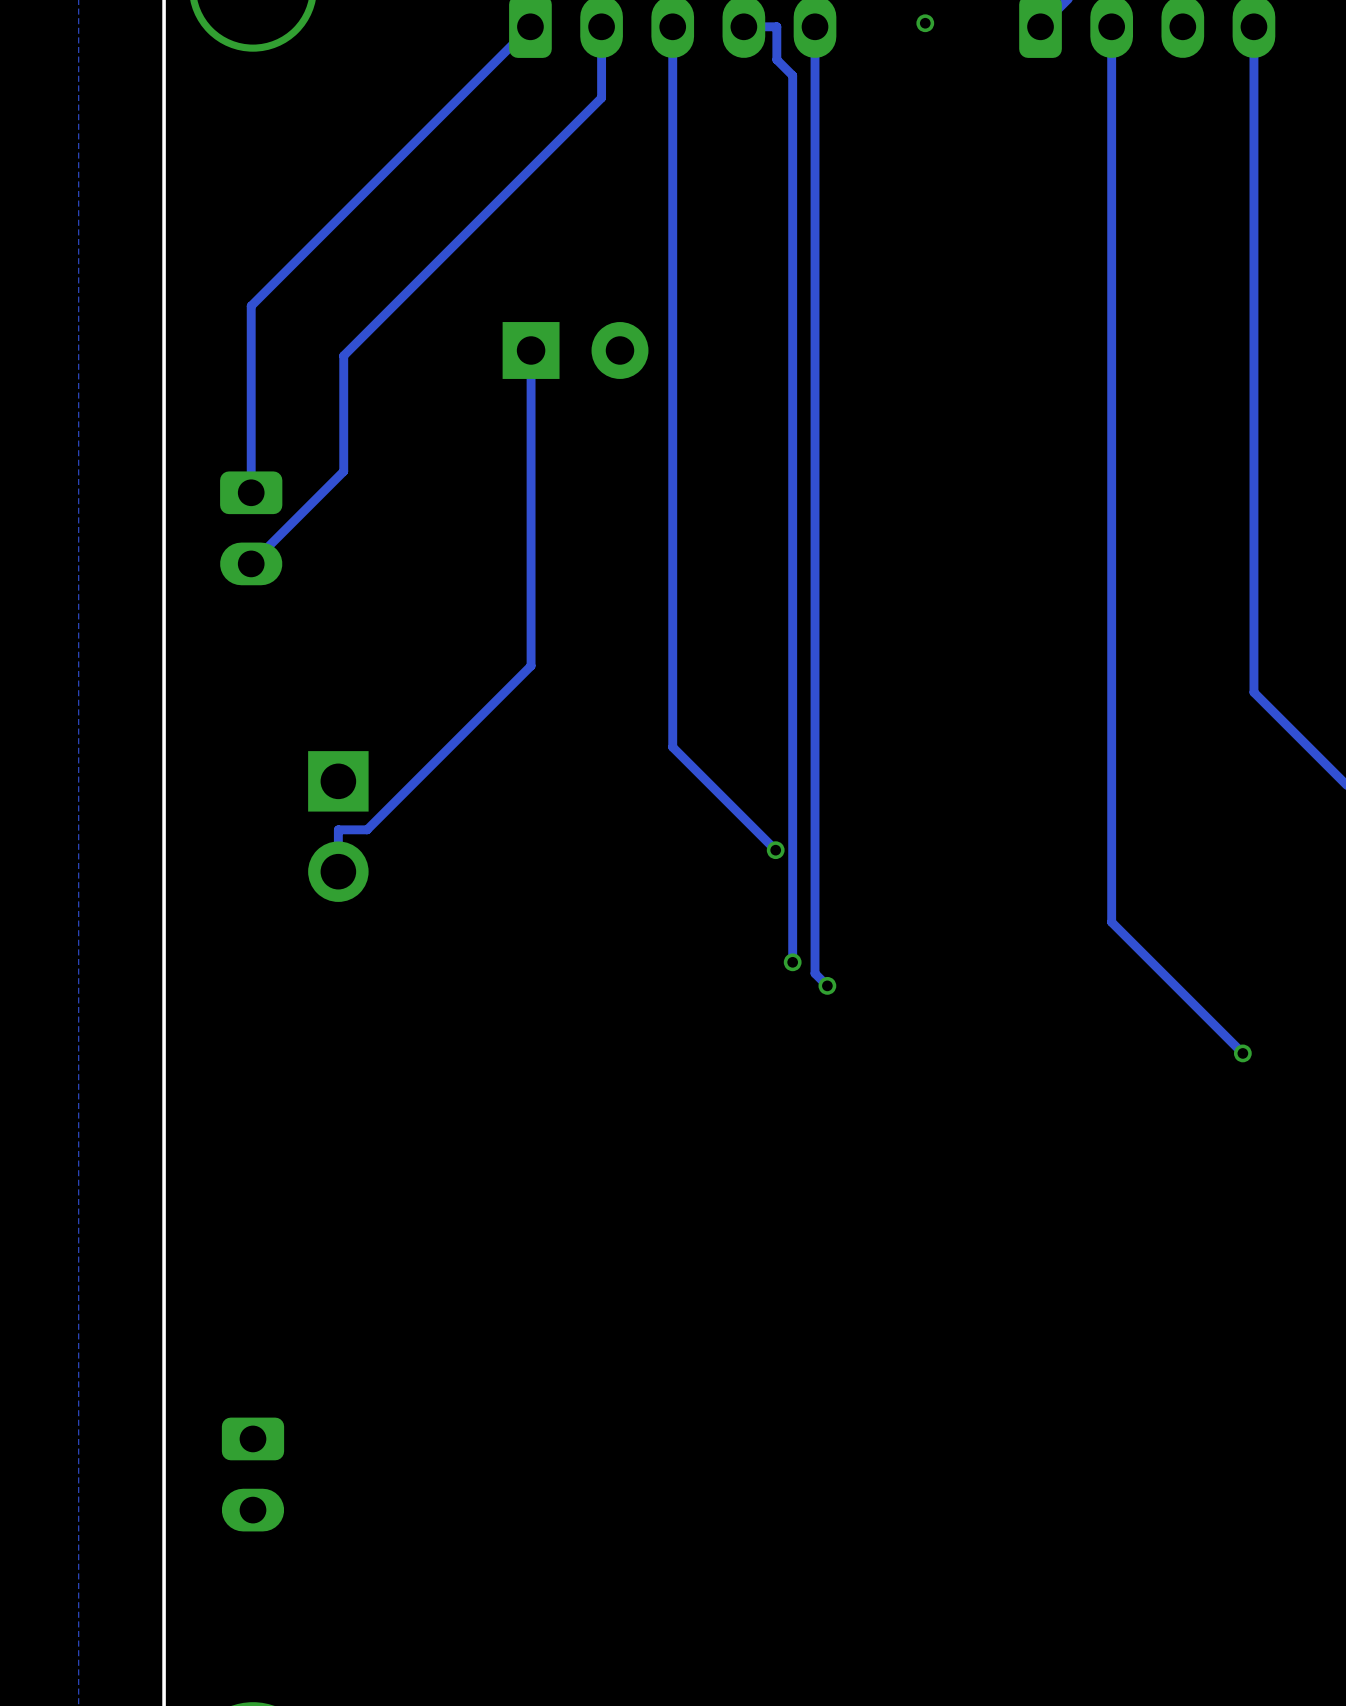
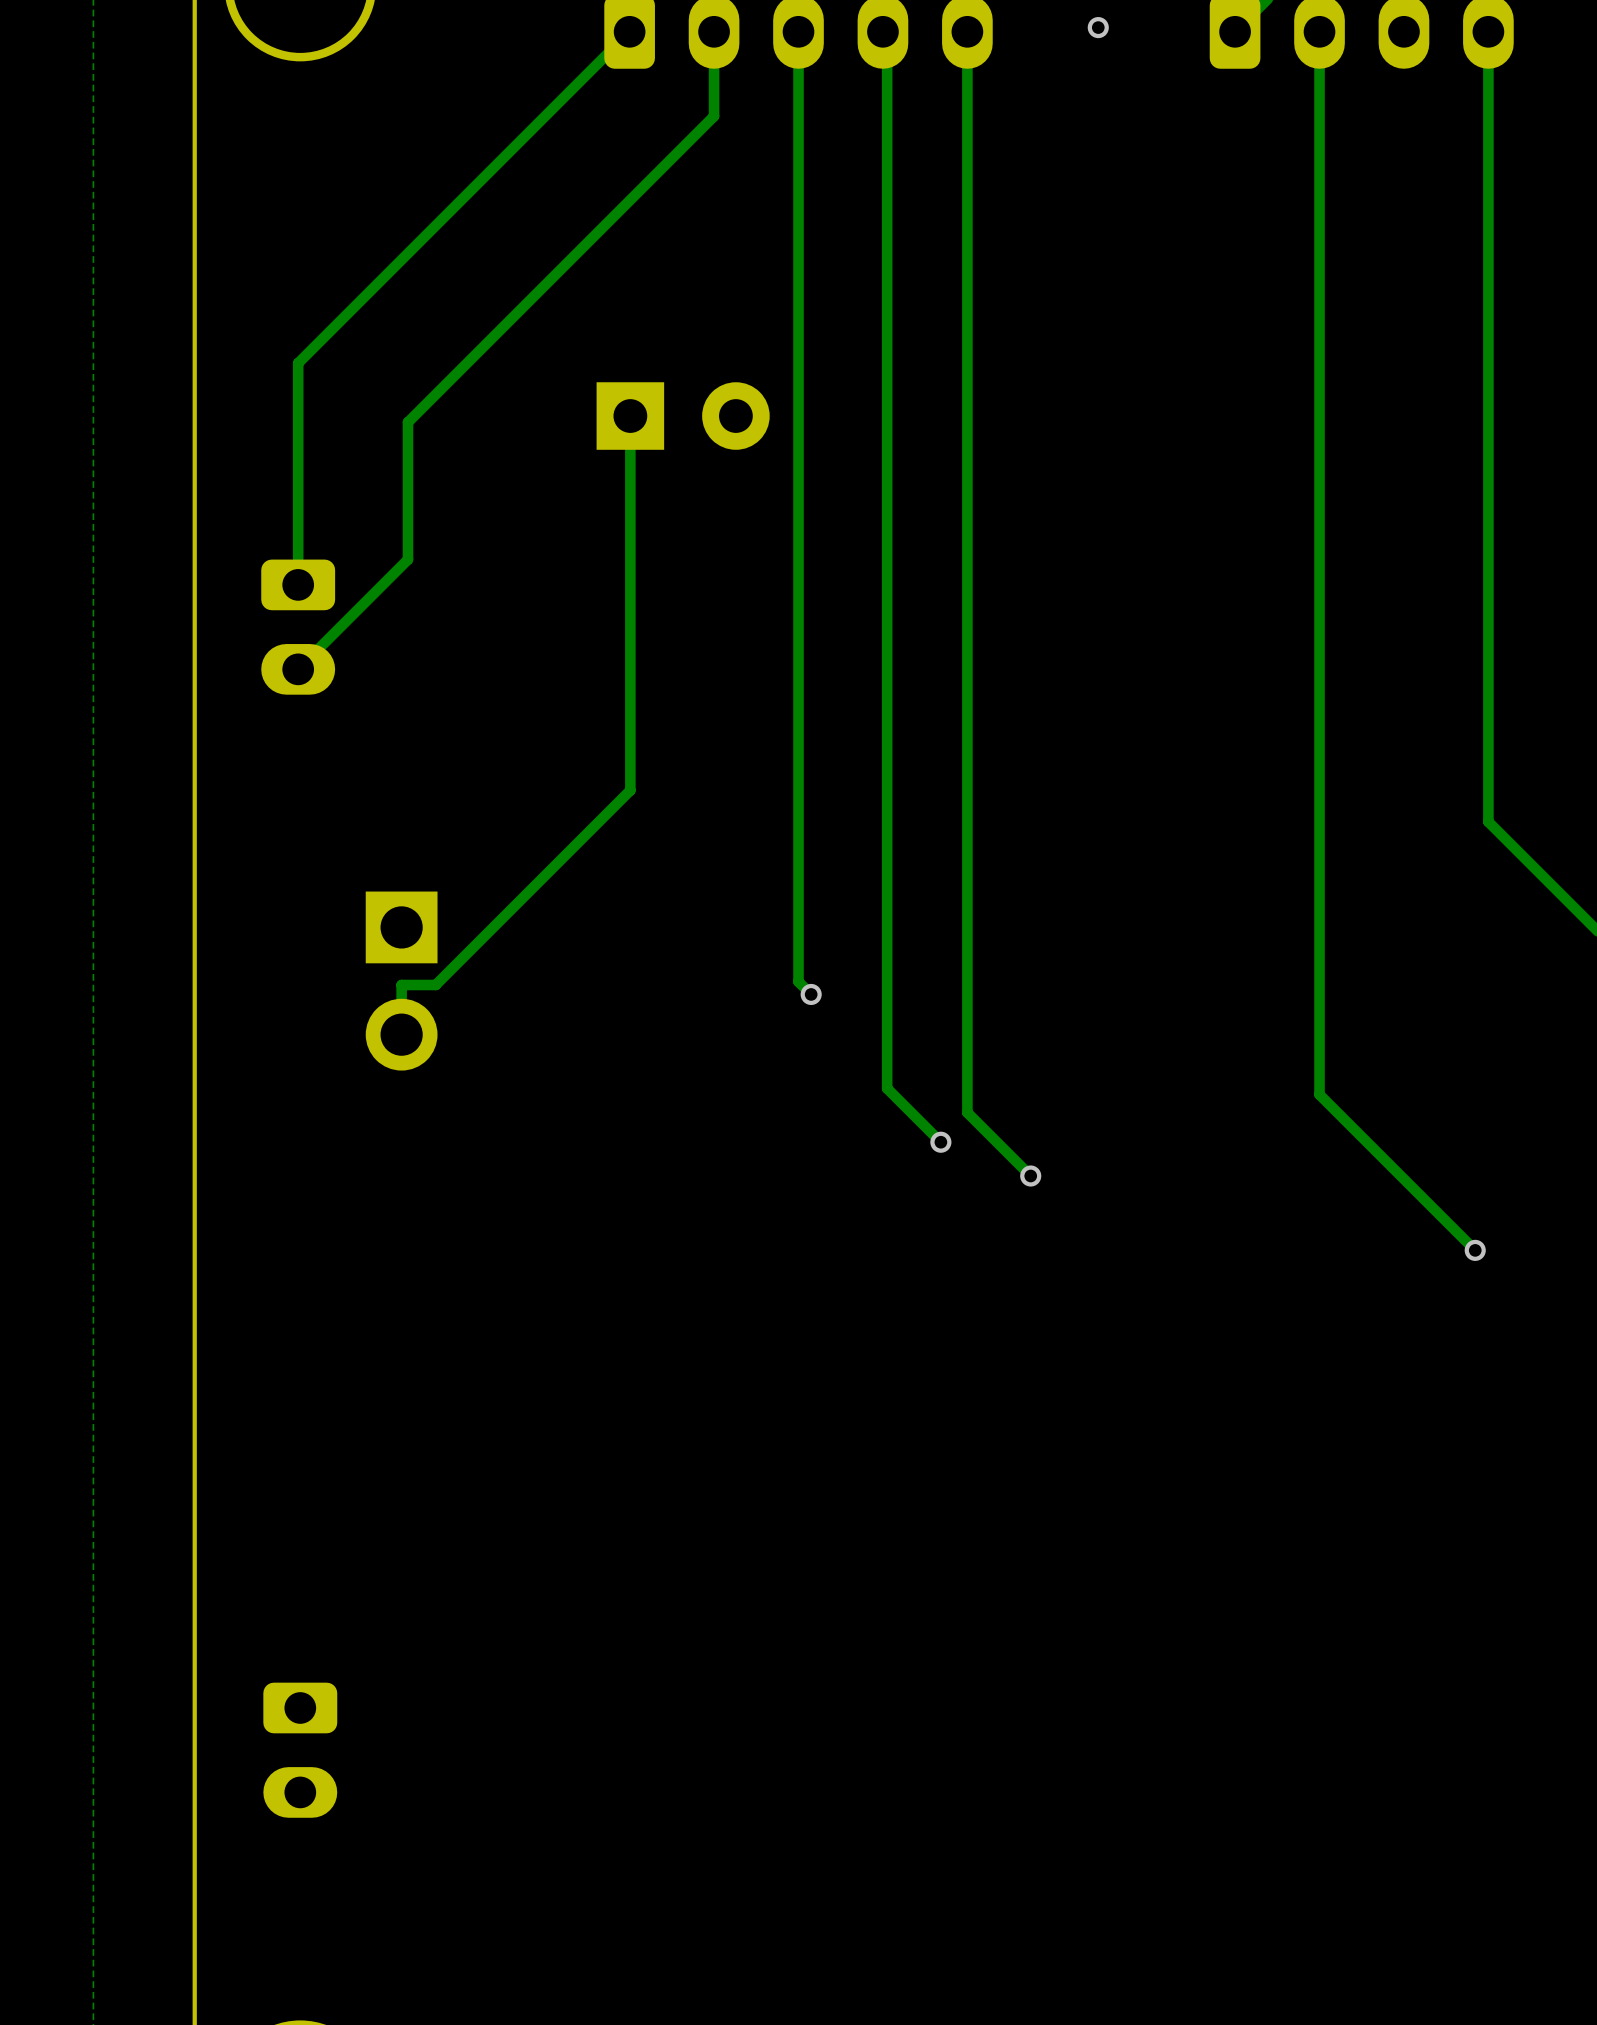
track: (743, 26) (776, 26) (776, 59) (792, 75) (792, 962) -> (887, 36) (887, 1088) (940, 1142)
track: (672, 747) (775, 850) -> (798, 886) (798, 981) (811, 994)
via: none -> (811, 994)
via: (775, 850) -> none
track: (815, 937) (815, 973) (827, 985) -> (967, 1112) (1030, 1176)
via position: (827, 985) -> (1030, 1176)

